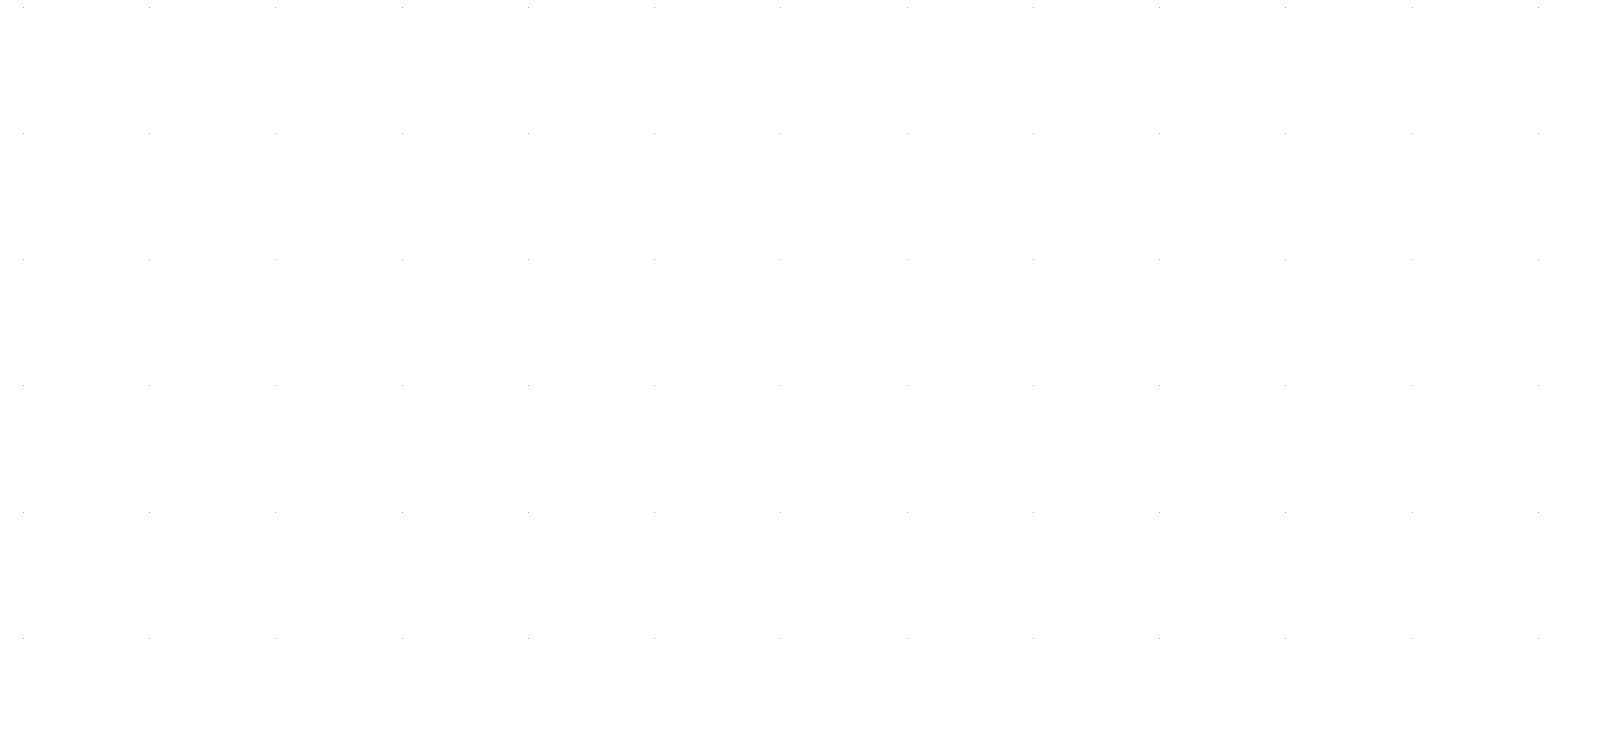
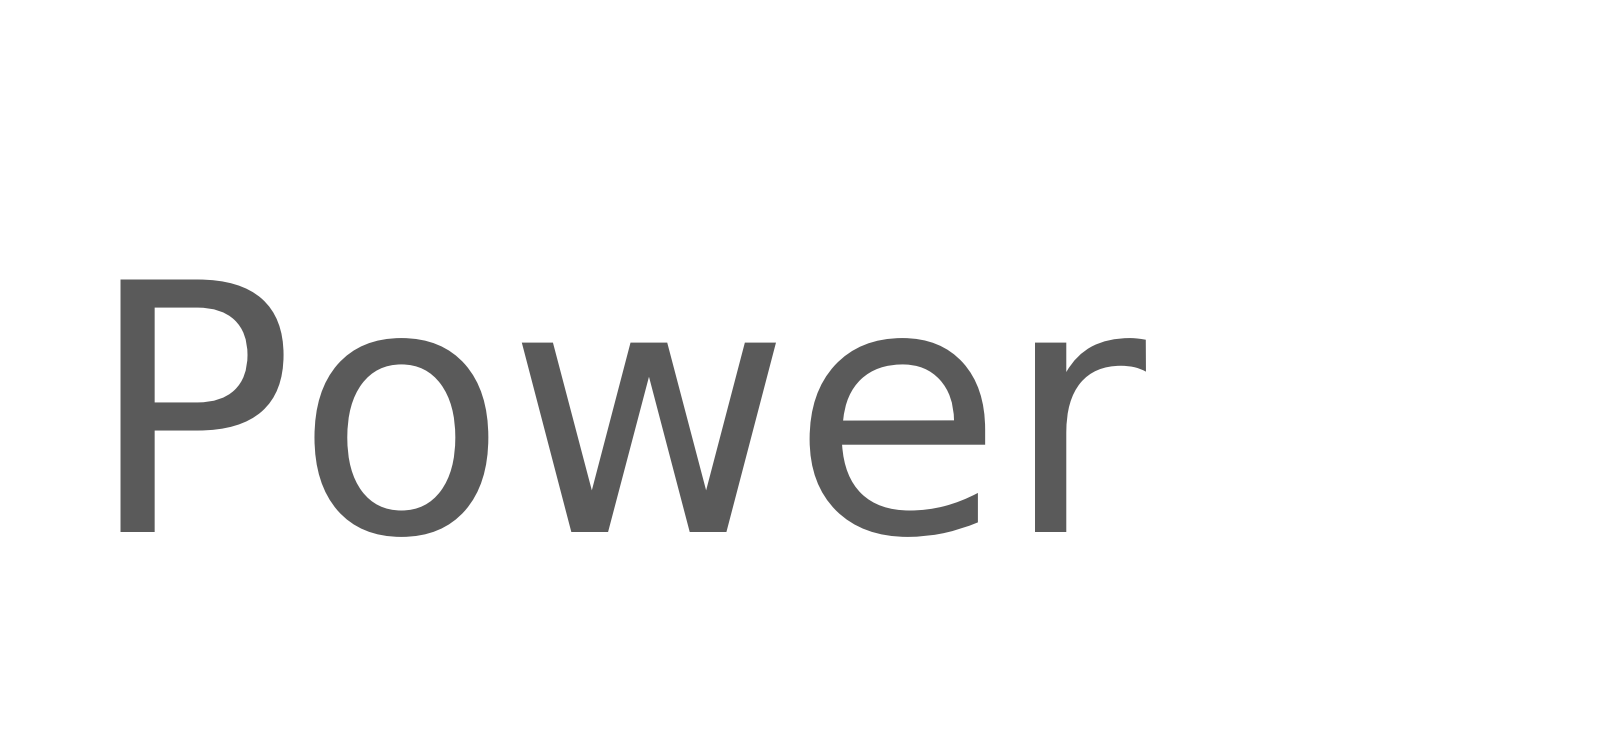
text: none -> Power (633, 408)

